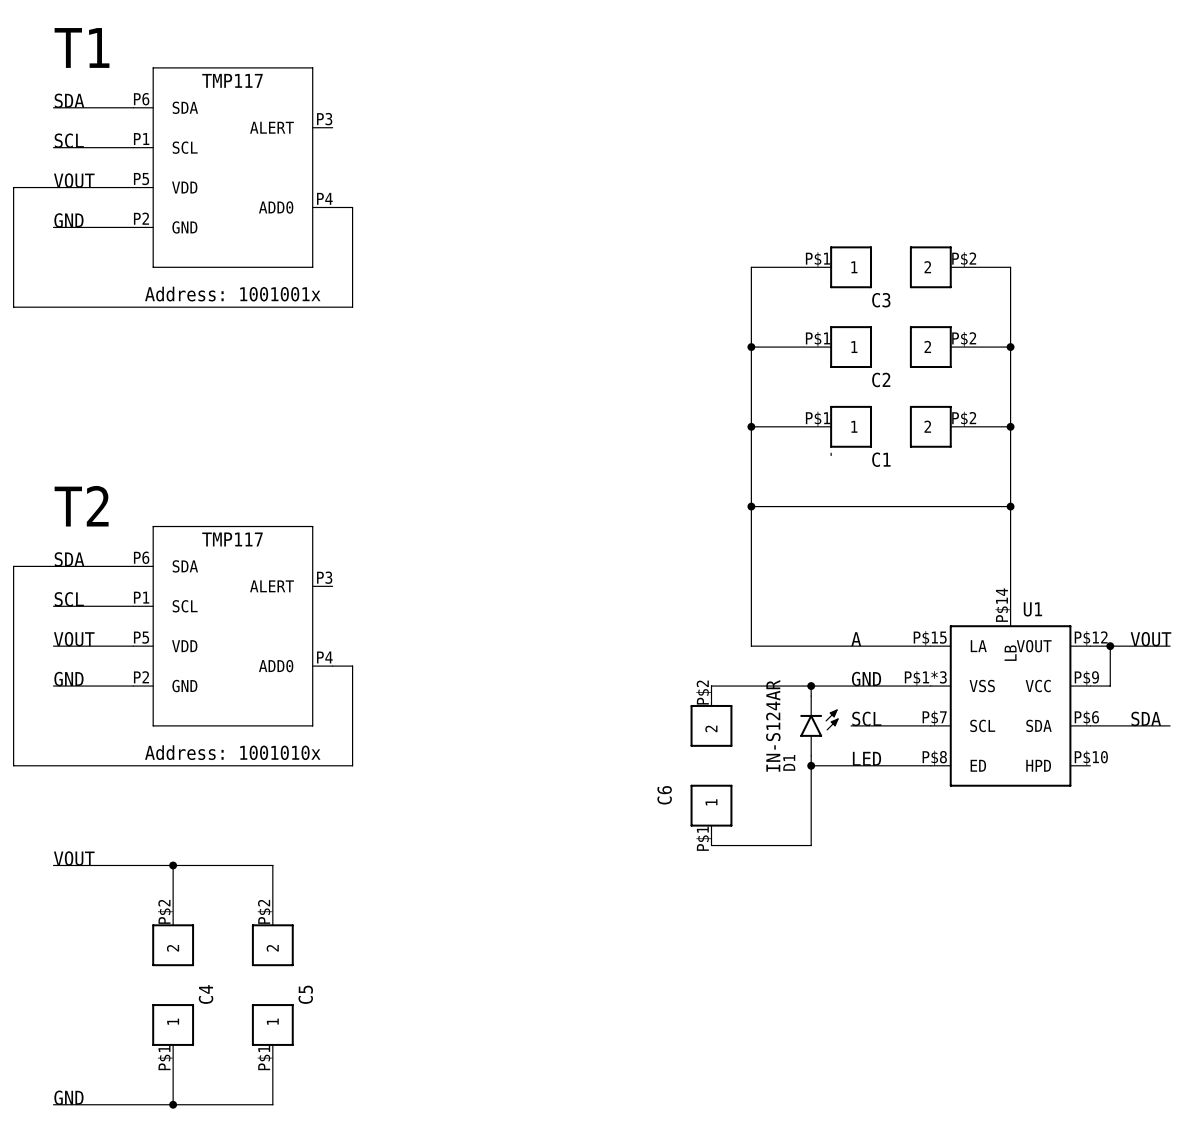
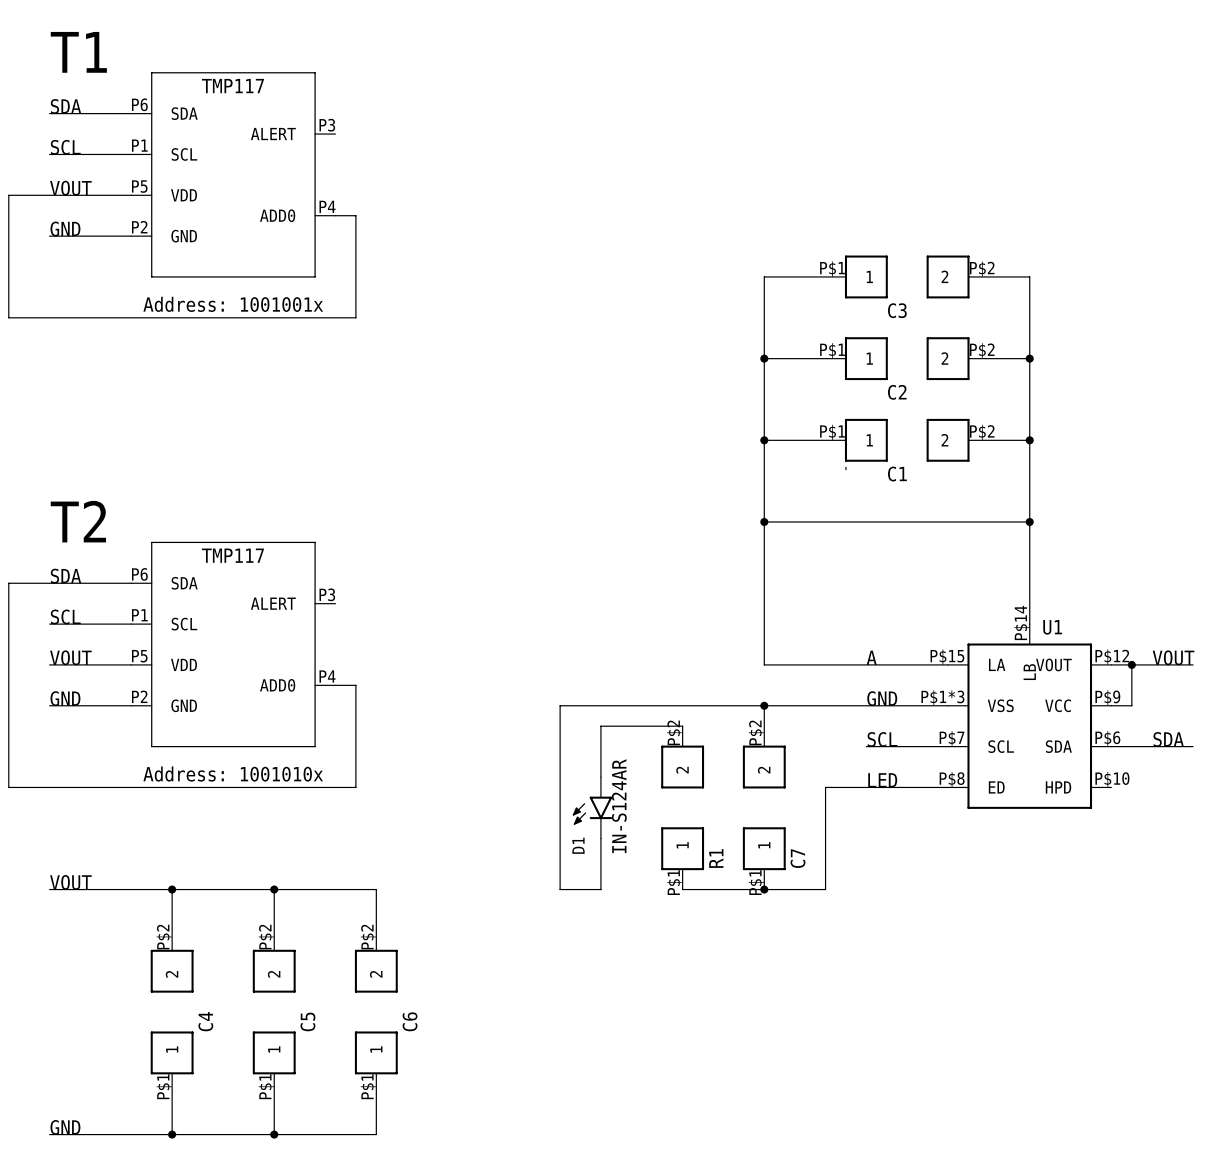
wire: (711, 686) (711, 705) -> (723, 705) (560, 705) (560, 889) (600, 889) (600, 838)
wire: none -> (764, 705) (764, 746)
junction: none -> (764, 705)
wire: (811, 686) (811, 696) -> none
junction: (811, 686) -> none
wire: none -> (682, 746) (682, 726) (600, 726) (600, 777)
part: IN-S124AR (819, 725) -> none
wire: (811, 755) (811, 765) -> none
text: D1 (789, 762) -> none
C6 position: (711, 765) -> (376, 1012)
junction: (811, 765) -> none
part: none -> IN-S124AR (592, 807)
R1: none -> (682, 807)
C7: none -> (764, 807)
C6 name position: C6 (664, 795) -> C6 (410, 1021)
text: none -> D1 (578, 845)
wire: (711, 825) (711, 845) (811, 845) -> (682, 869) (682, 889) (825, 889) (825, 869)
wire: none -> (764, 869) (764, 889)
wire: none -> (274, 889) (376, 889) (376, 950)
junction: none -> (274, 889)
junction: none -> (764, 889)
wire: none -> (376, 1073) (376, 1134) (274, 1134)
junction: none -> (274, 1134)

